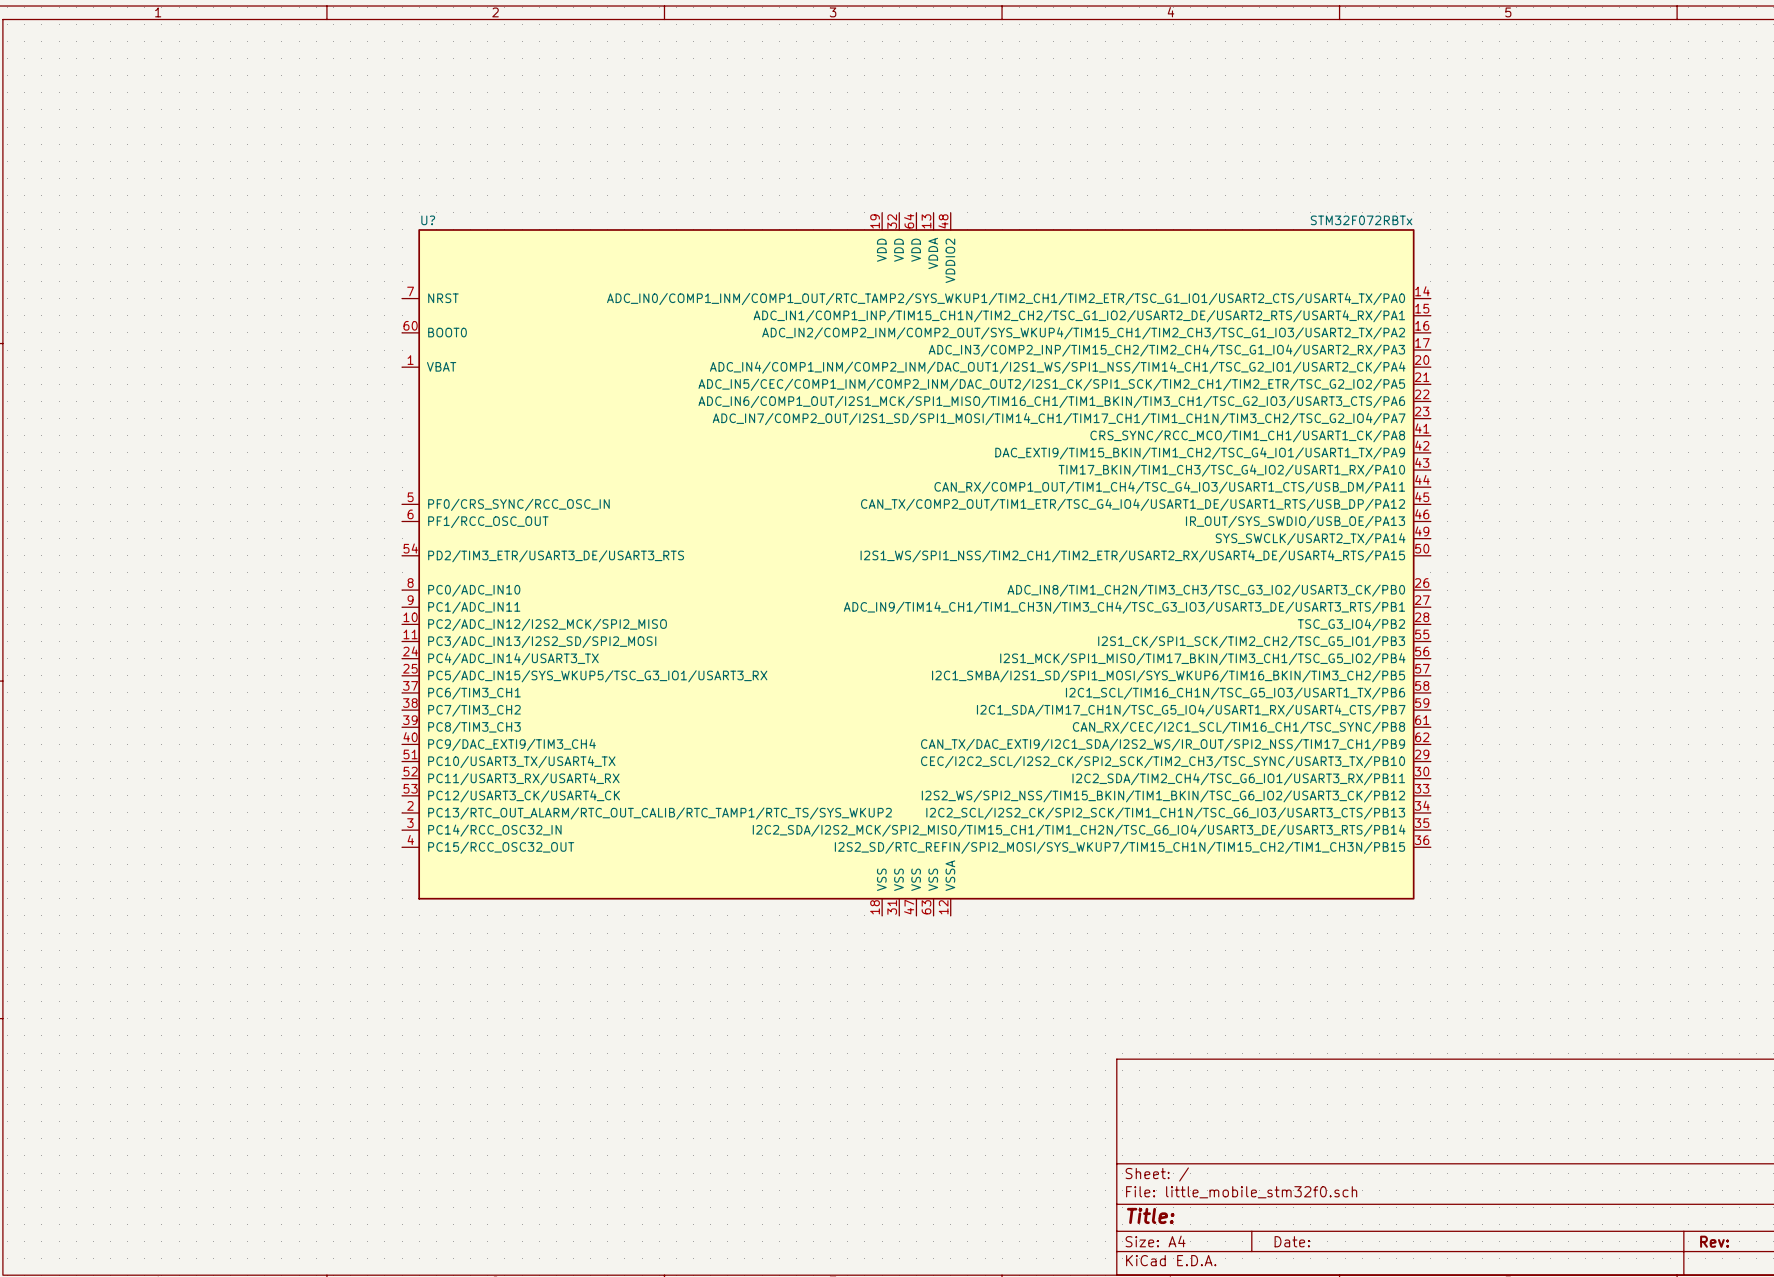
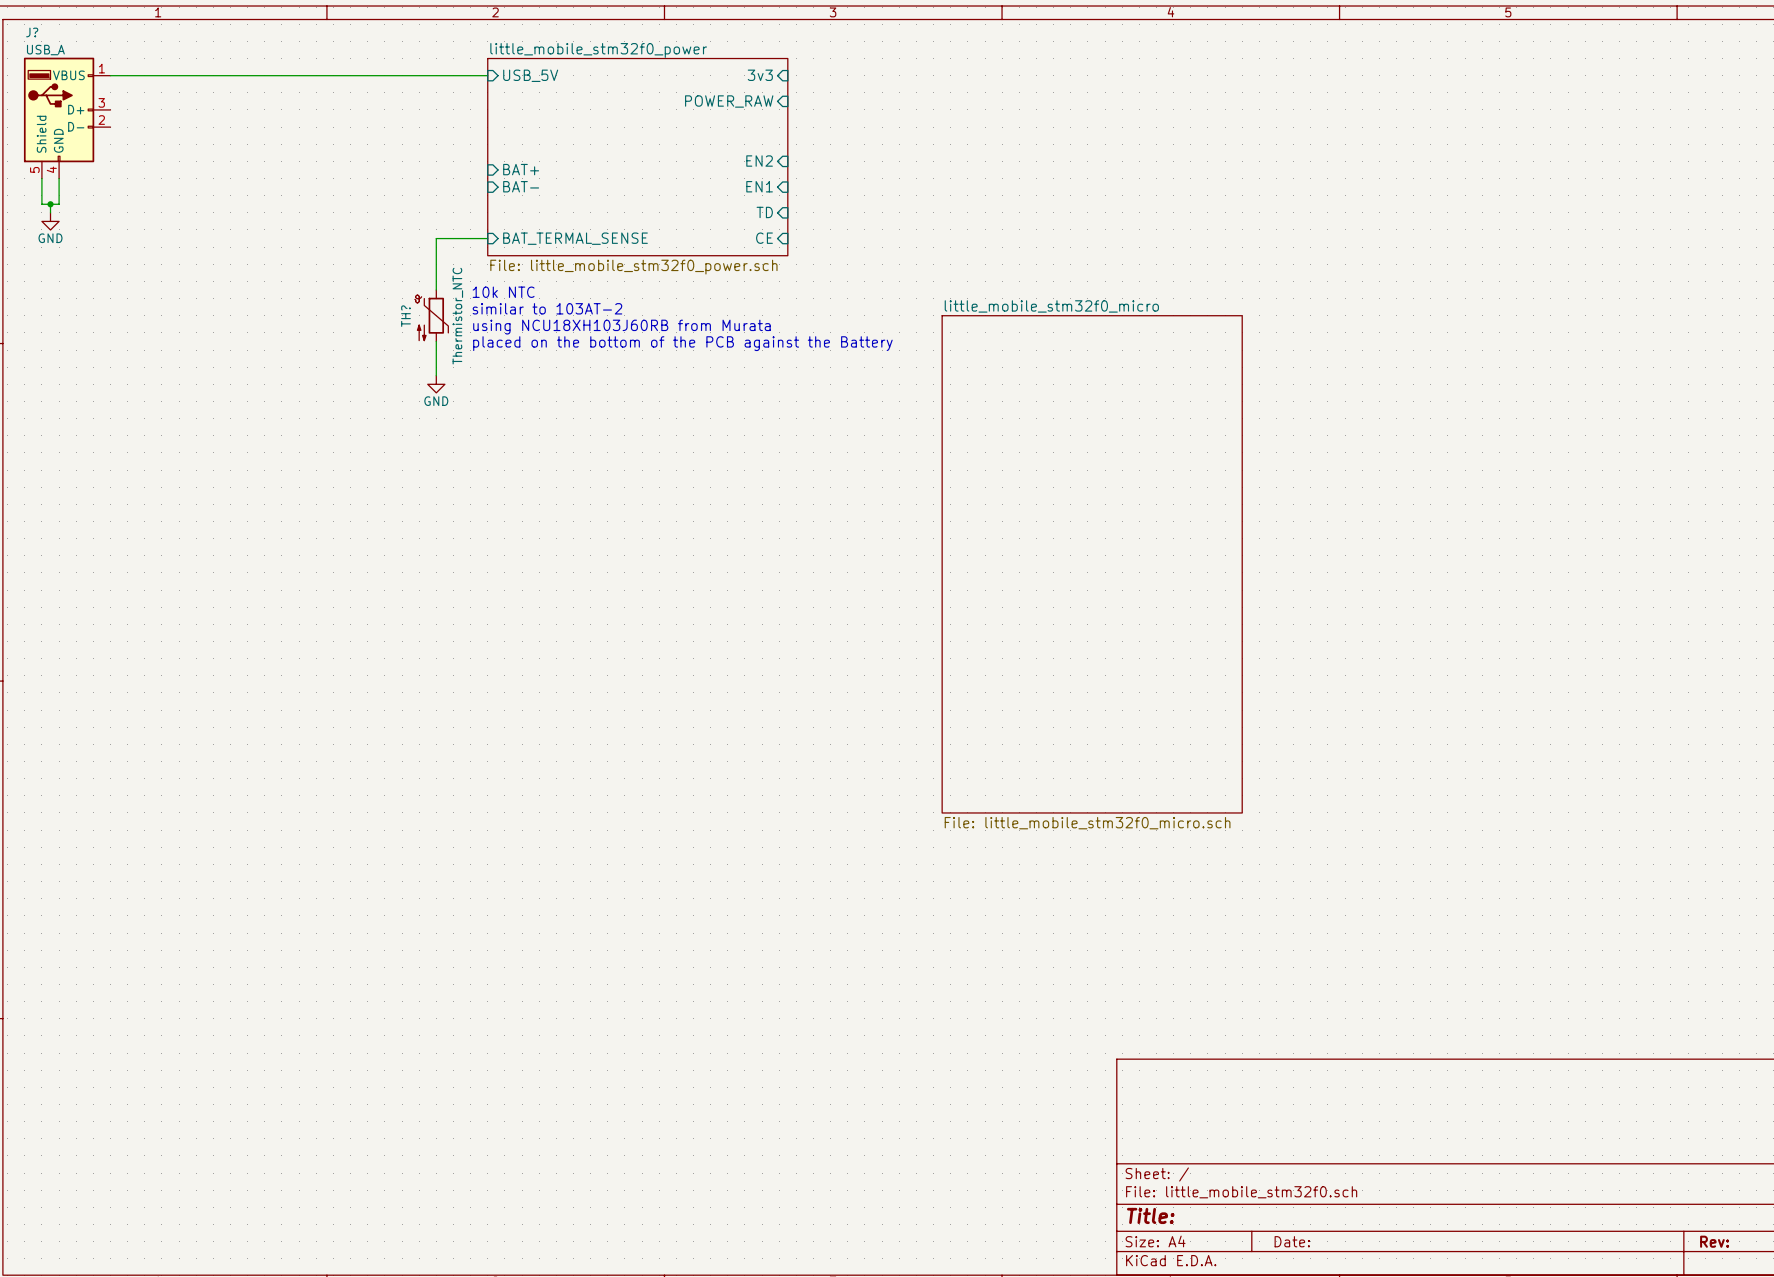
wire: none -> (110, 75) (487, 75)
sheet pin: none -> USB_5V (530, 75)
sheet pin: none -> 3v3 (760, 75)
sheet pin: none -> POWER_RAW (729, 101)
J?: none -> USB_A (67, 118)
sheet little_mobile_stm32f0_power: none -> File: little_mobile_stm32f0_power.sch (637, 157)
sheet pin: none -> EN2 (759, 161)
sheet pin: none -> BAT+ (521, 169)
wire: none -> (41, 178) (41, 204) (59, 204) (59, 178)
sheet pin: none -> BAT- (521, 186)
sheet pin: none -> EN1 (759, 186)
wire: none -> (50, 204) (50, 212)
junction: none -> (50, 204)
sheet pin: none -> TD (764, 212)
power symbol: none -> GND (50, 221)
sheet pin: none -> BAT_TERMAL_SENSE (575, 238)
sheet pin: none -> CE (764, 238)
text: none -> 10k NTC (503, 292)
text: none -> similar to 103AT-2 (547, 308)
TH?: none -> Thermistor_NTC (431, 315)
text: none -> using NCU18XH103J60RB from Murata (621, 327)
text: none -> placed on the bottom of the PCB against the Battery (682, 343)
power symbol: none -> GND (436, 384)
U?: STM32F072RBTx (916, 564) -> none
sheet little_mobile_stm32f0_micro: none -> File: little_mobile_stm32f0_micro.sch (1092, 564)

